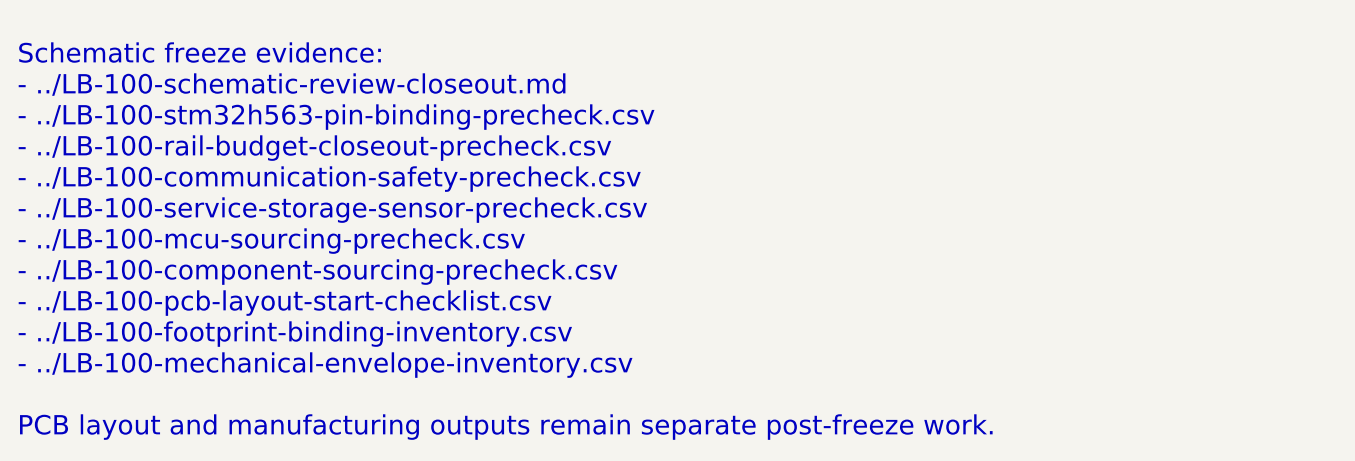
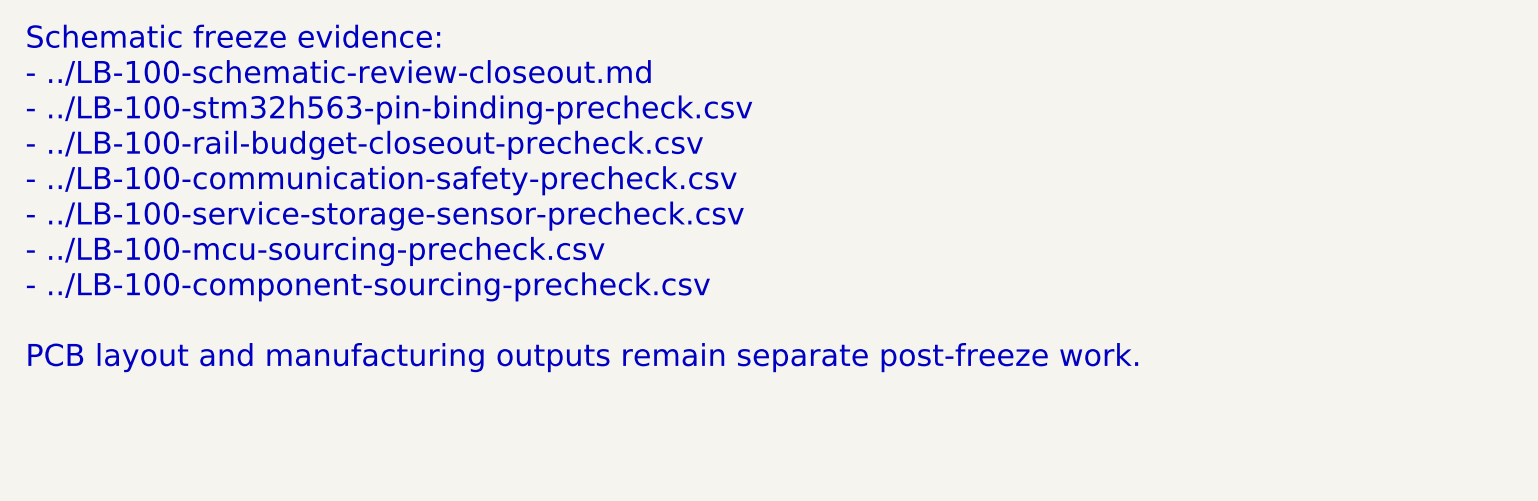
text: - ../LB-100-pcb-layout-start-checklist.csv (285, 303) -> none
text: - ../LB-100-footprint-binding-inventory.csv (295, 334) -> PCB layout and manufacturing outputs remain separate post-freeze work. (583, 357)
text: - ../LB-100-mechanical-envelope-inventory.csv (325, 365) -> none
text: PCB layout and manufacturing outputs remain separate post-freeze work. (506, 427) -> none

